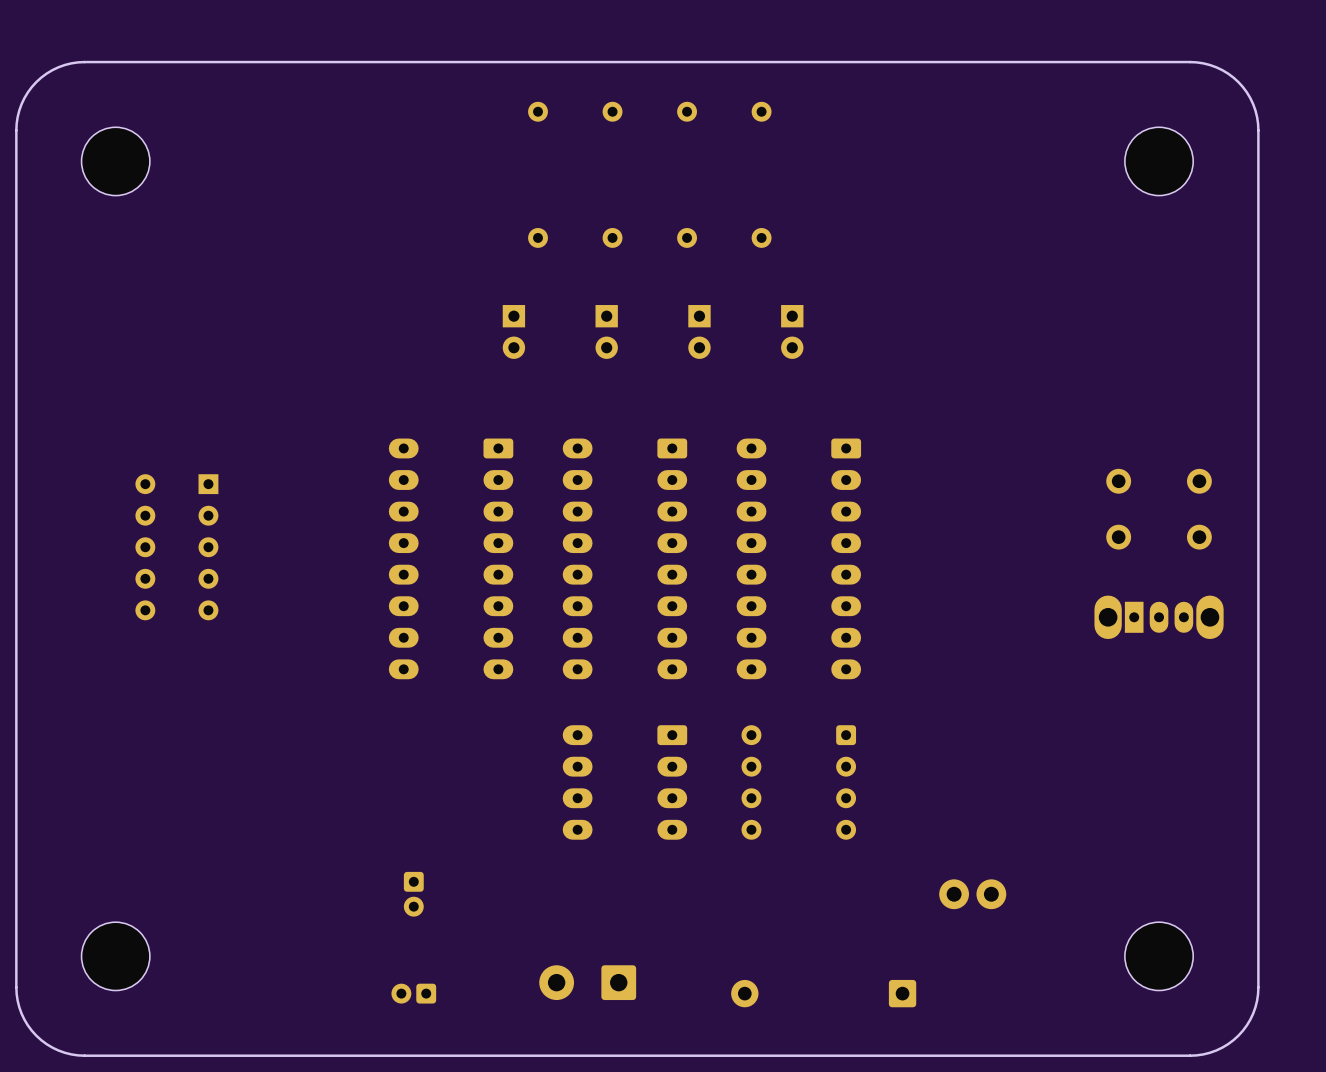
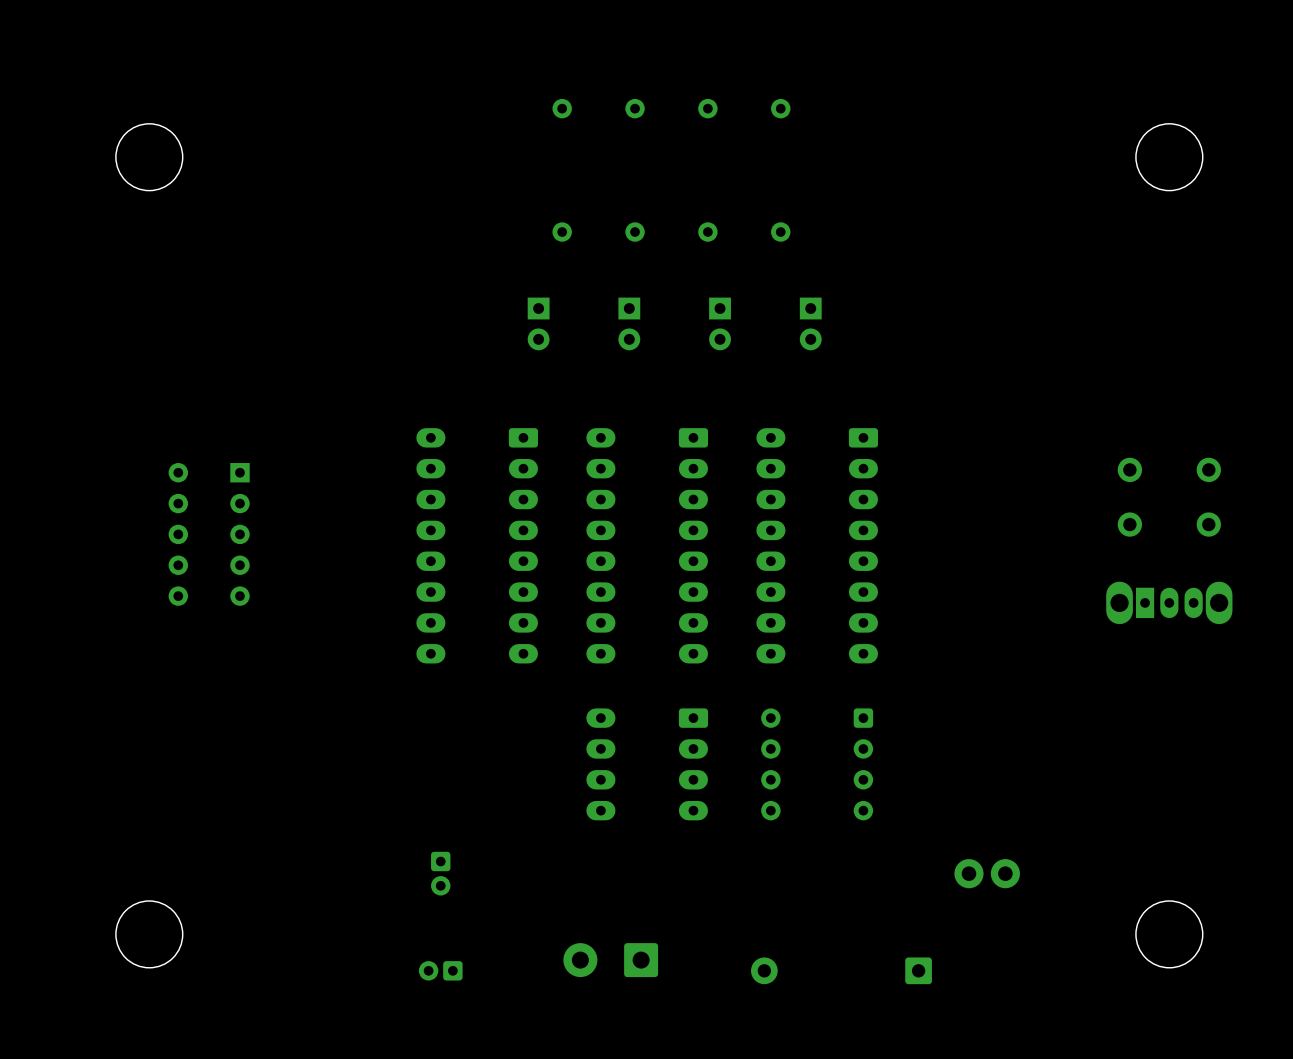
board edge: (1190, 62) (84, 62) (64, 65) (41, 77) (31, 87) (21, 104) (16, 130) (16, 987) (19, 1007) (31, 1030) (52, 1047) (64, 1052) (84, 1055) (1190, 1055) (1209, 1052) (1233, 1040) (1250, 1019) (1255, 1007) (1258, 987) (1258, 130) (1253, 104) (1238, 82) (1216, 67) (1190, 62) -> none

